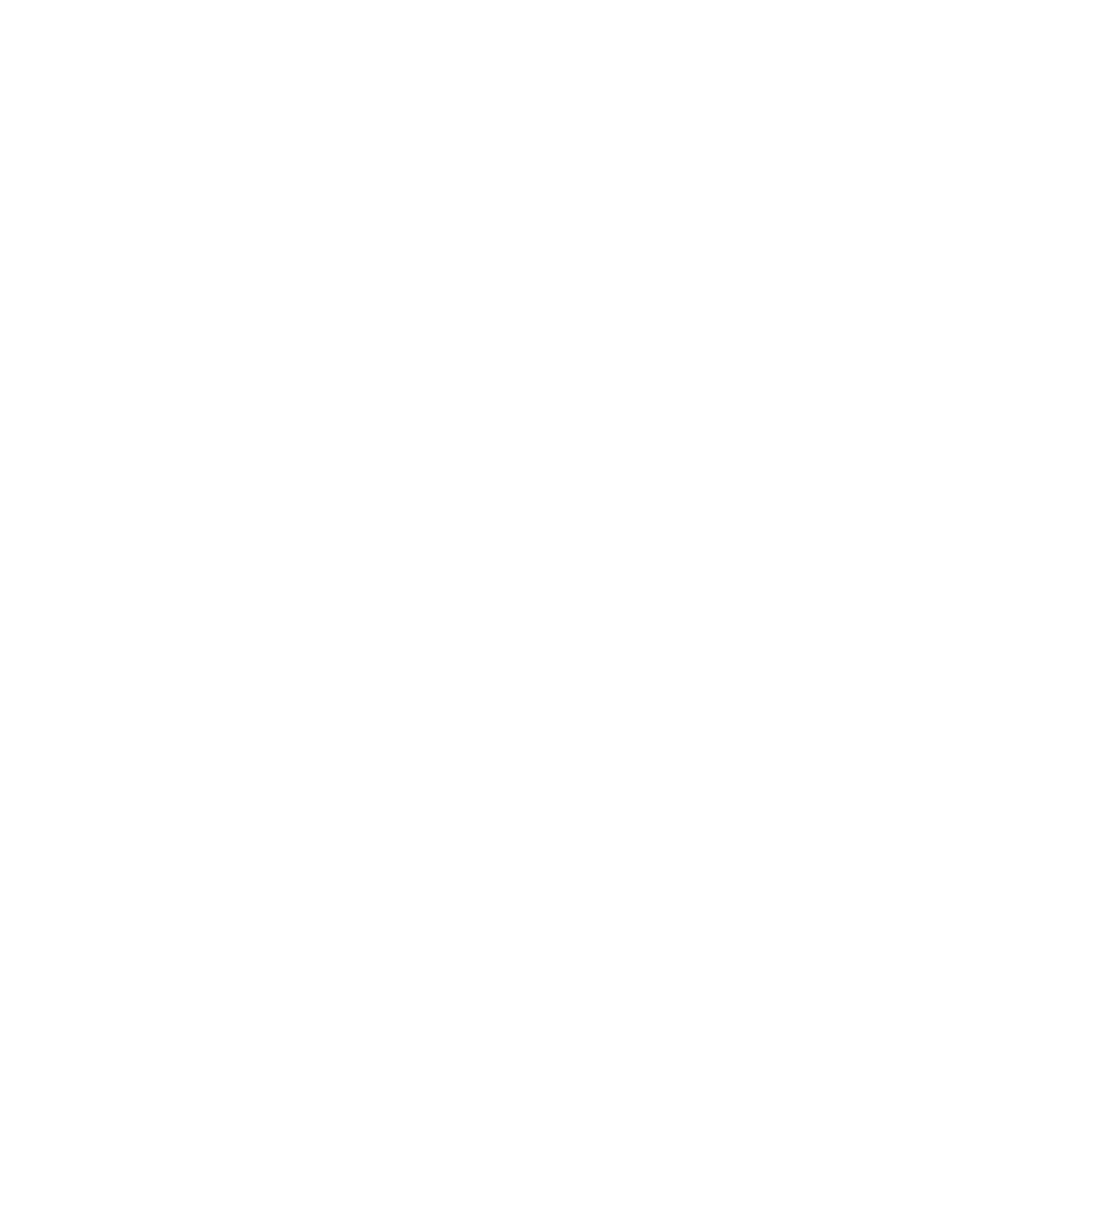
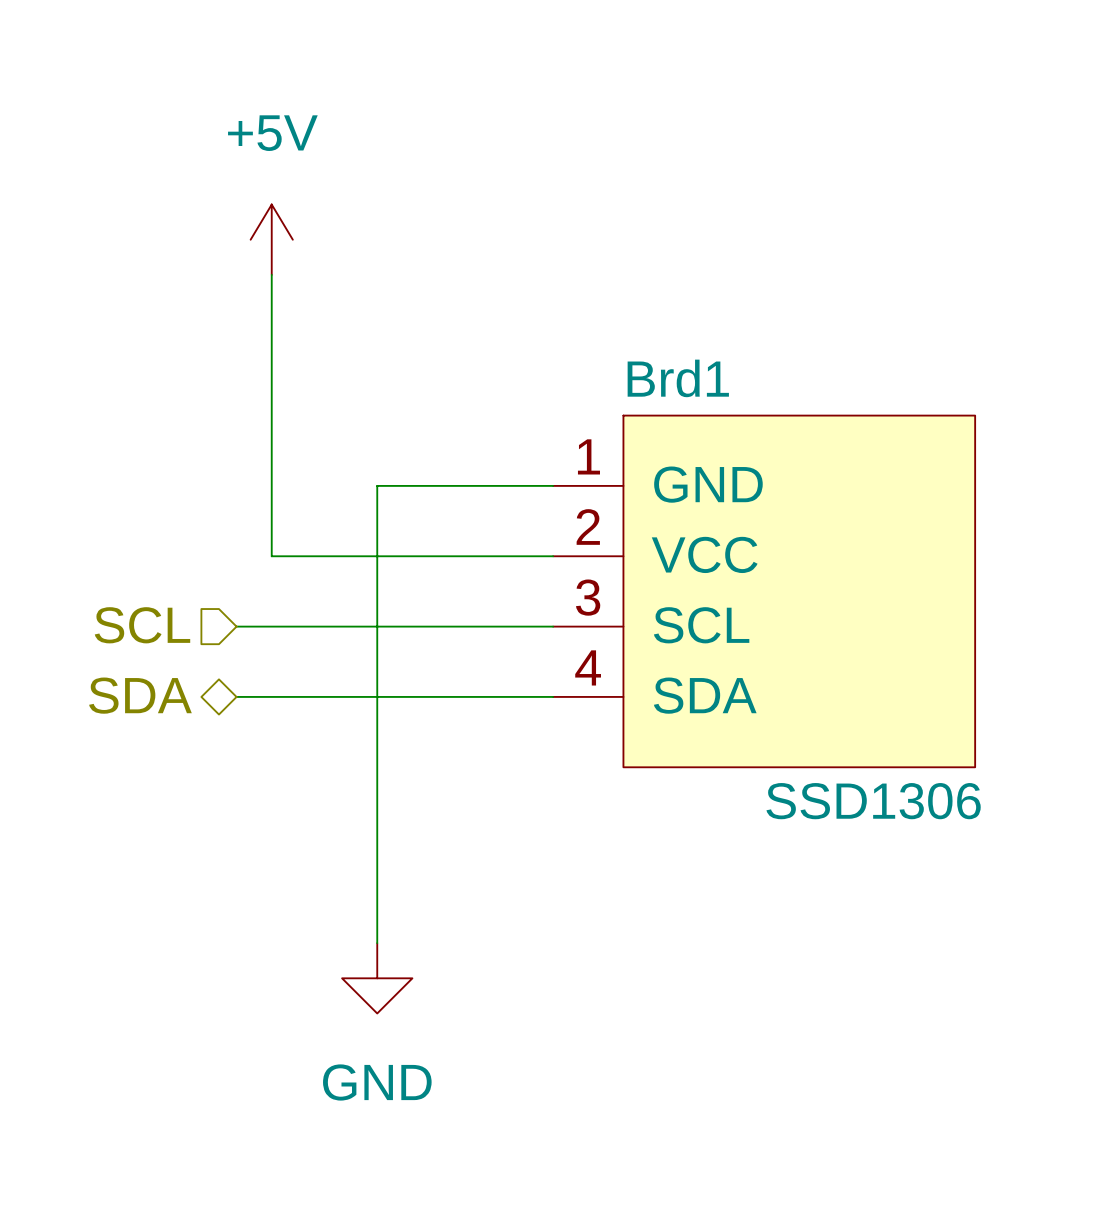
power symbol: none -> +5V (271, 239)
wire: none -> (271, 274) (271, 556) (553, 556)
wire: none -> (553, 485) (377, 485) (377, 943)
Brd1: none -> SSD1306 (764, 591)
hierarchical label: none -> SCL (142, 625)
wire: none -> (236, 626) (553, 626)
hierarchical label: none -> SDA (140, 695)
wire: none -> (236, 696) (553, 696)
power symbol: none -> GND (377, 978)

